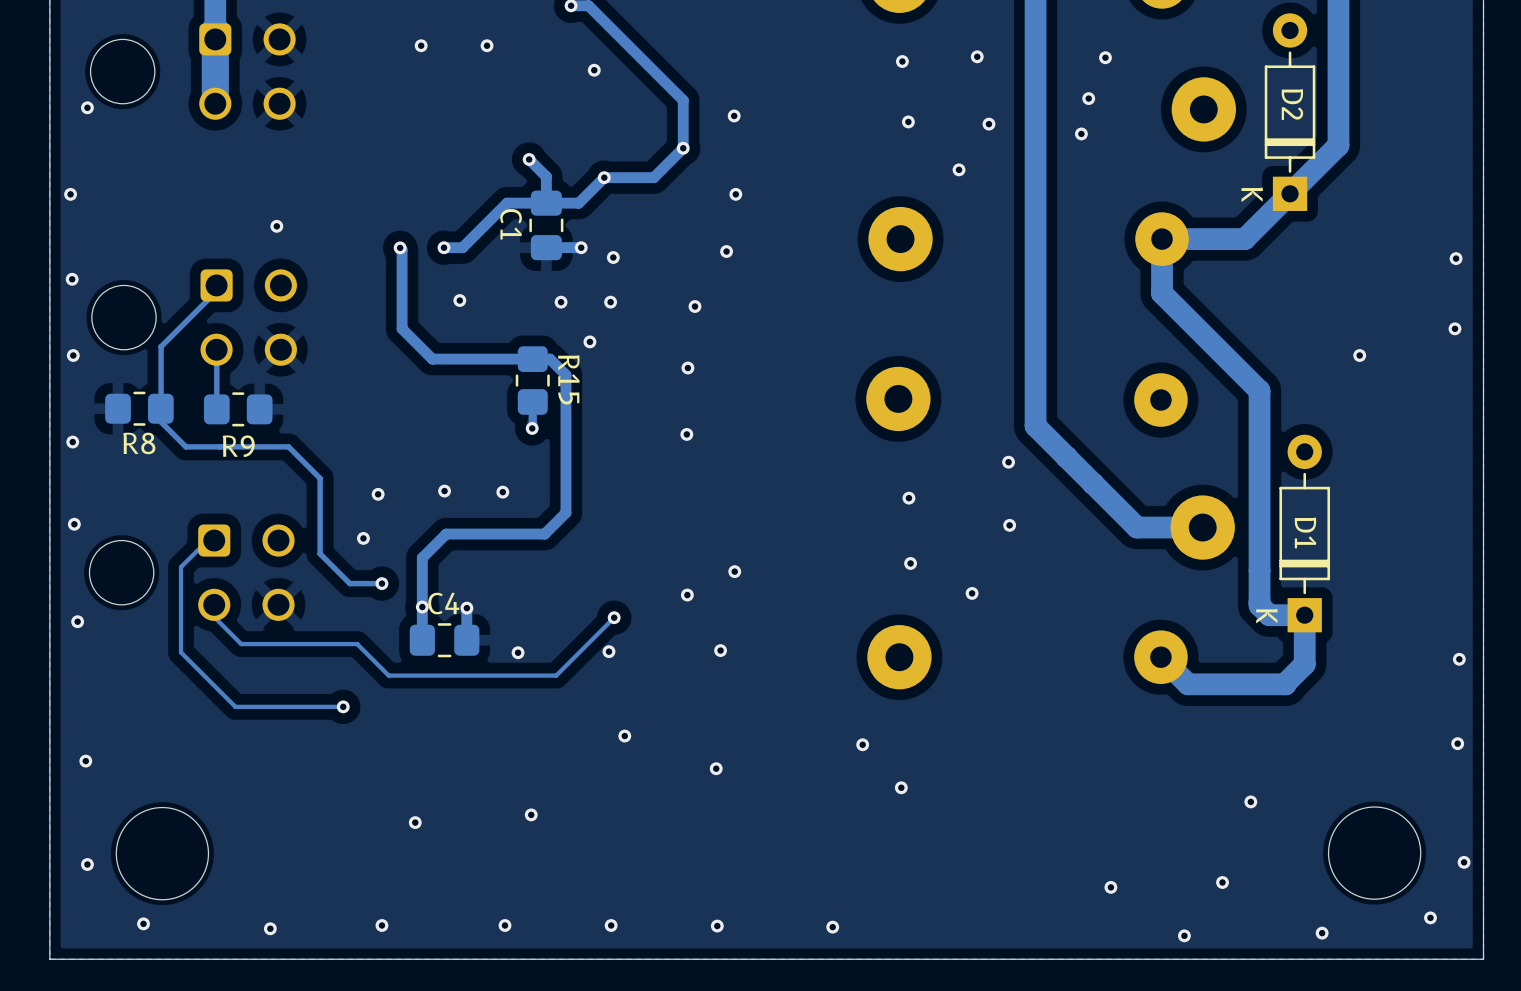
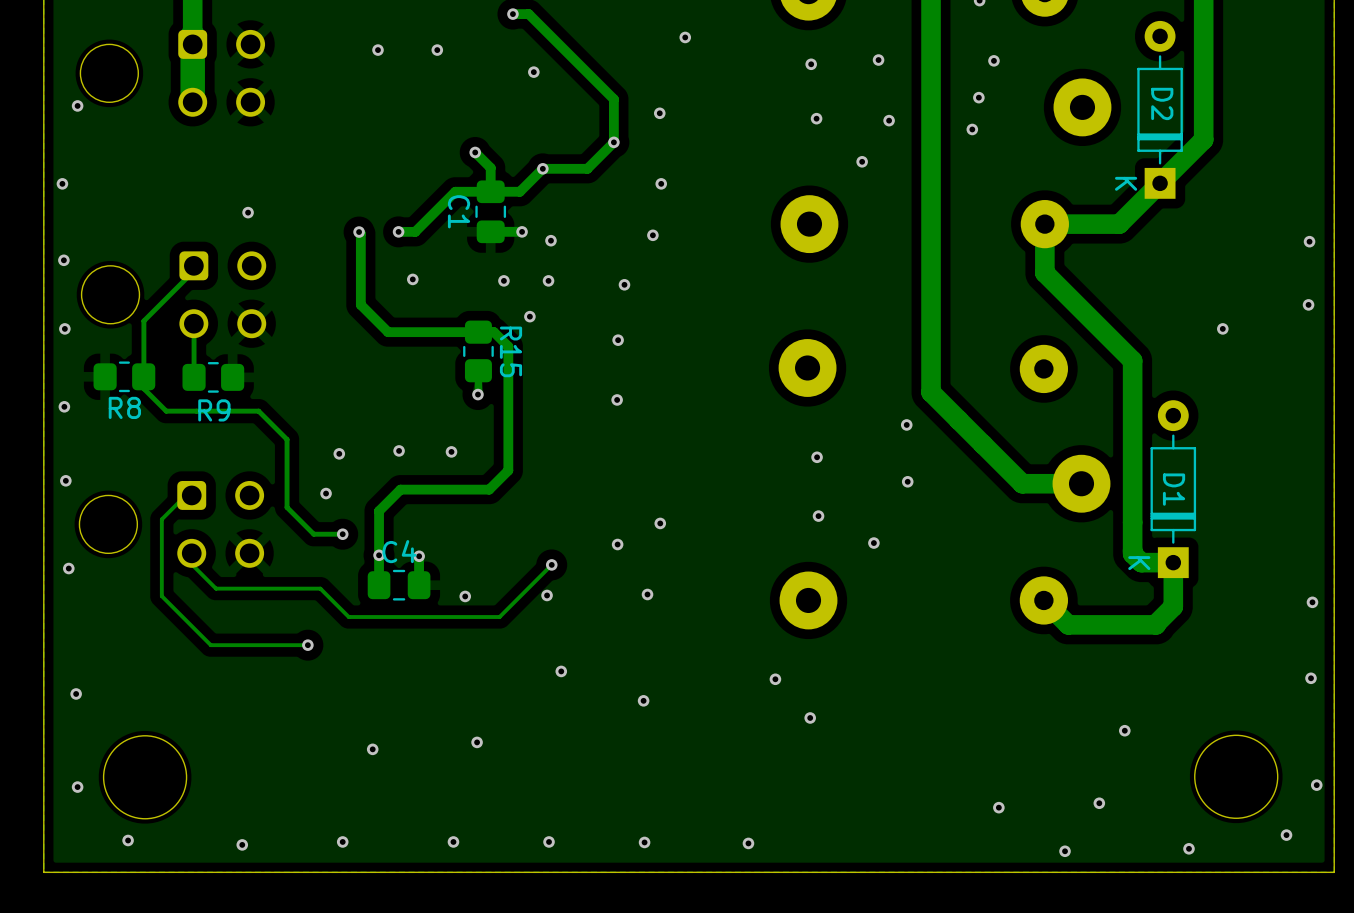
via: none -> (685, 37)

